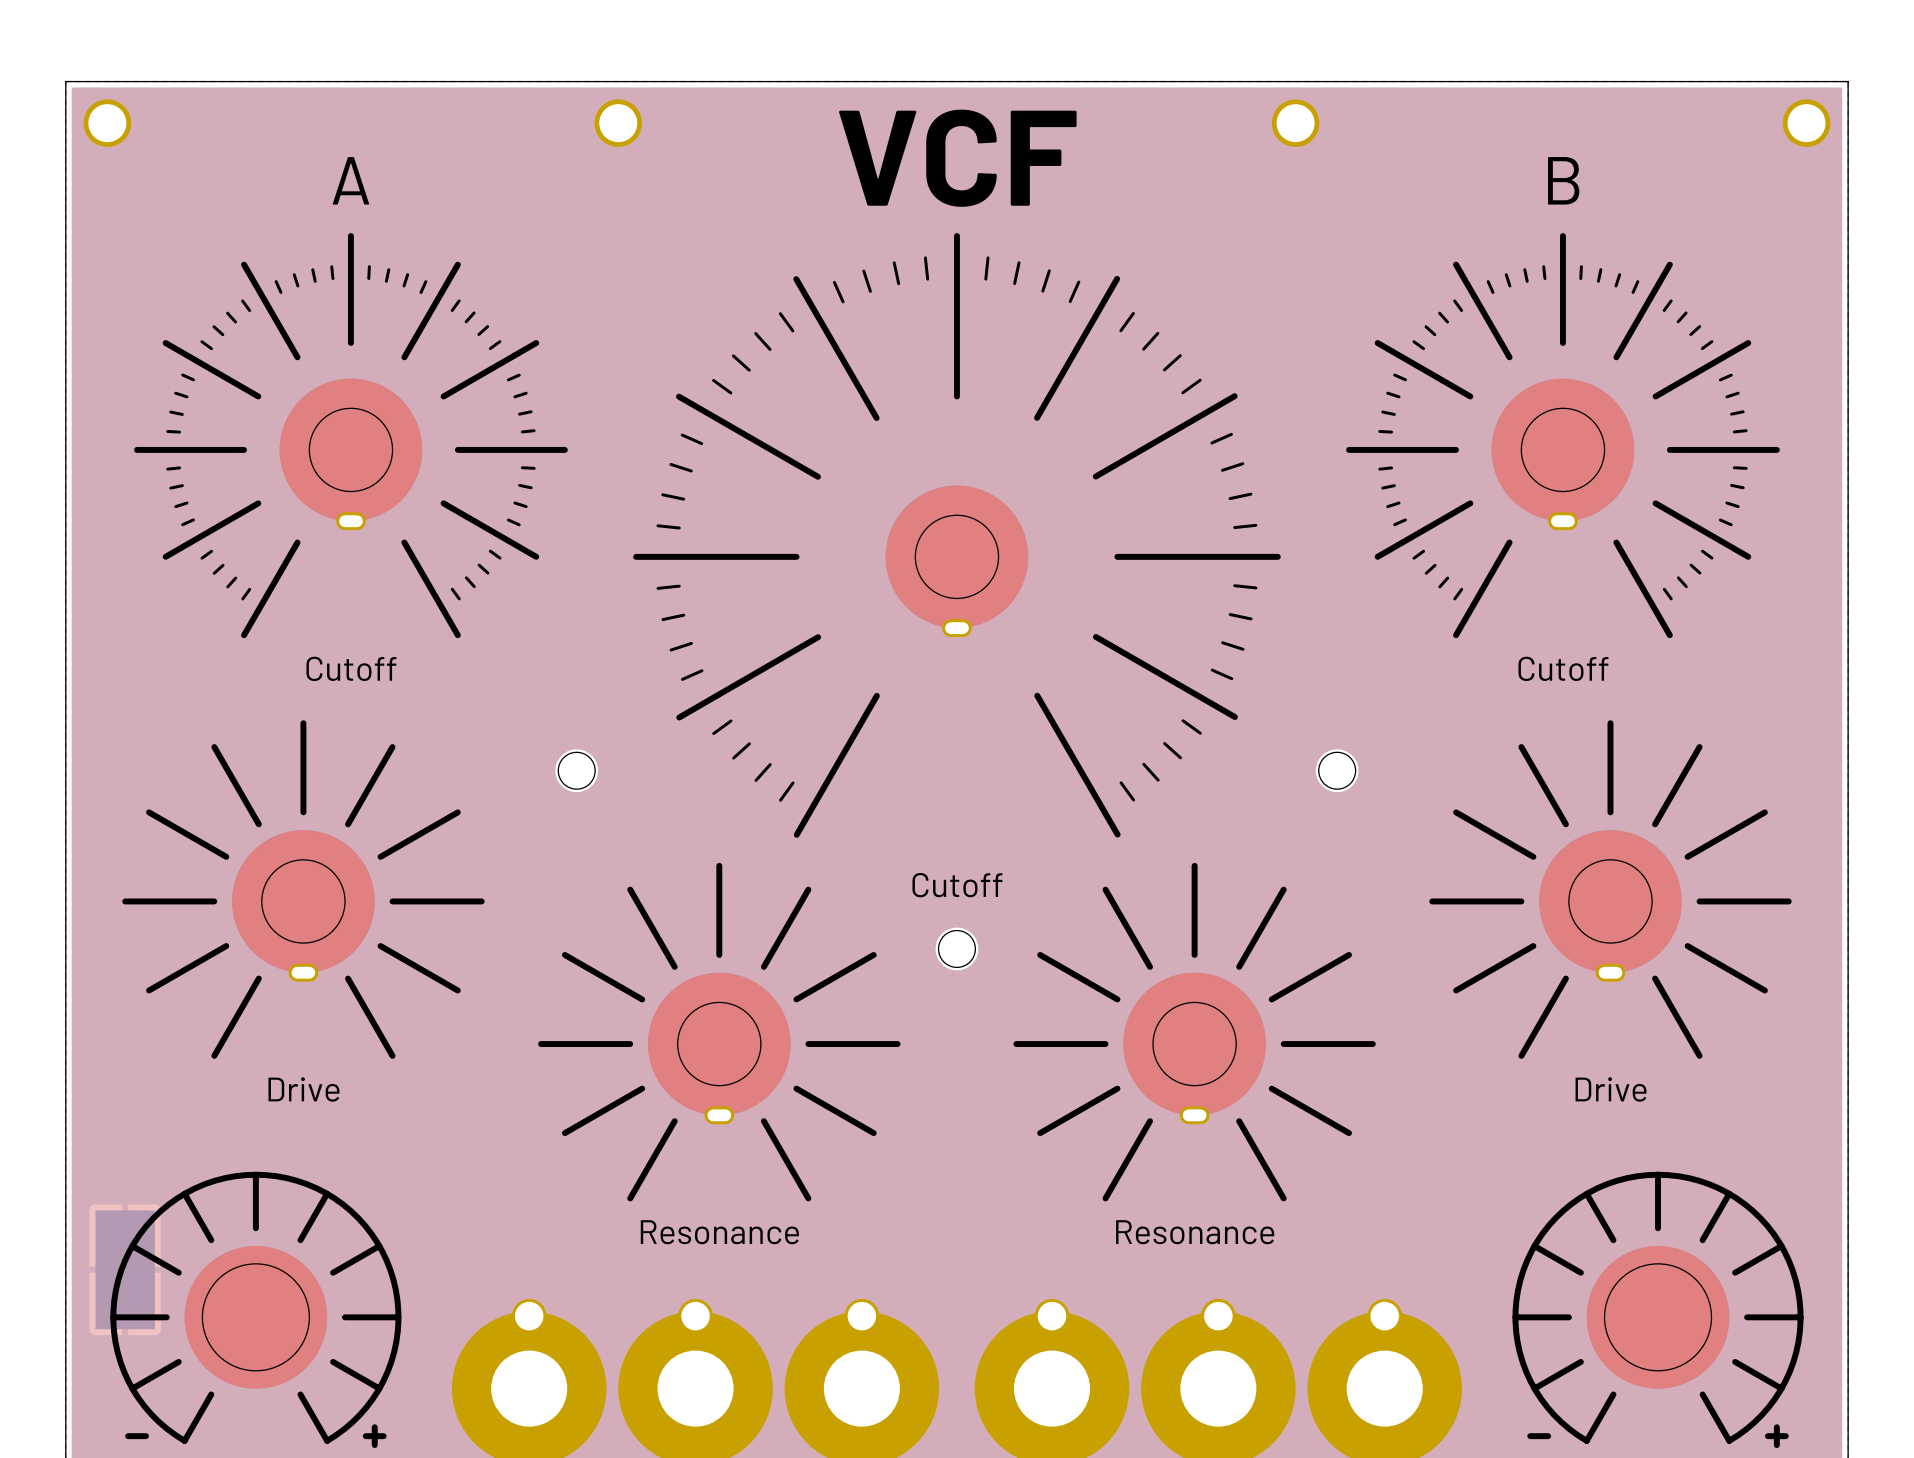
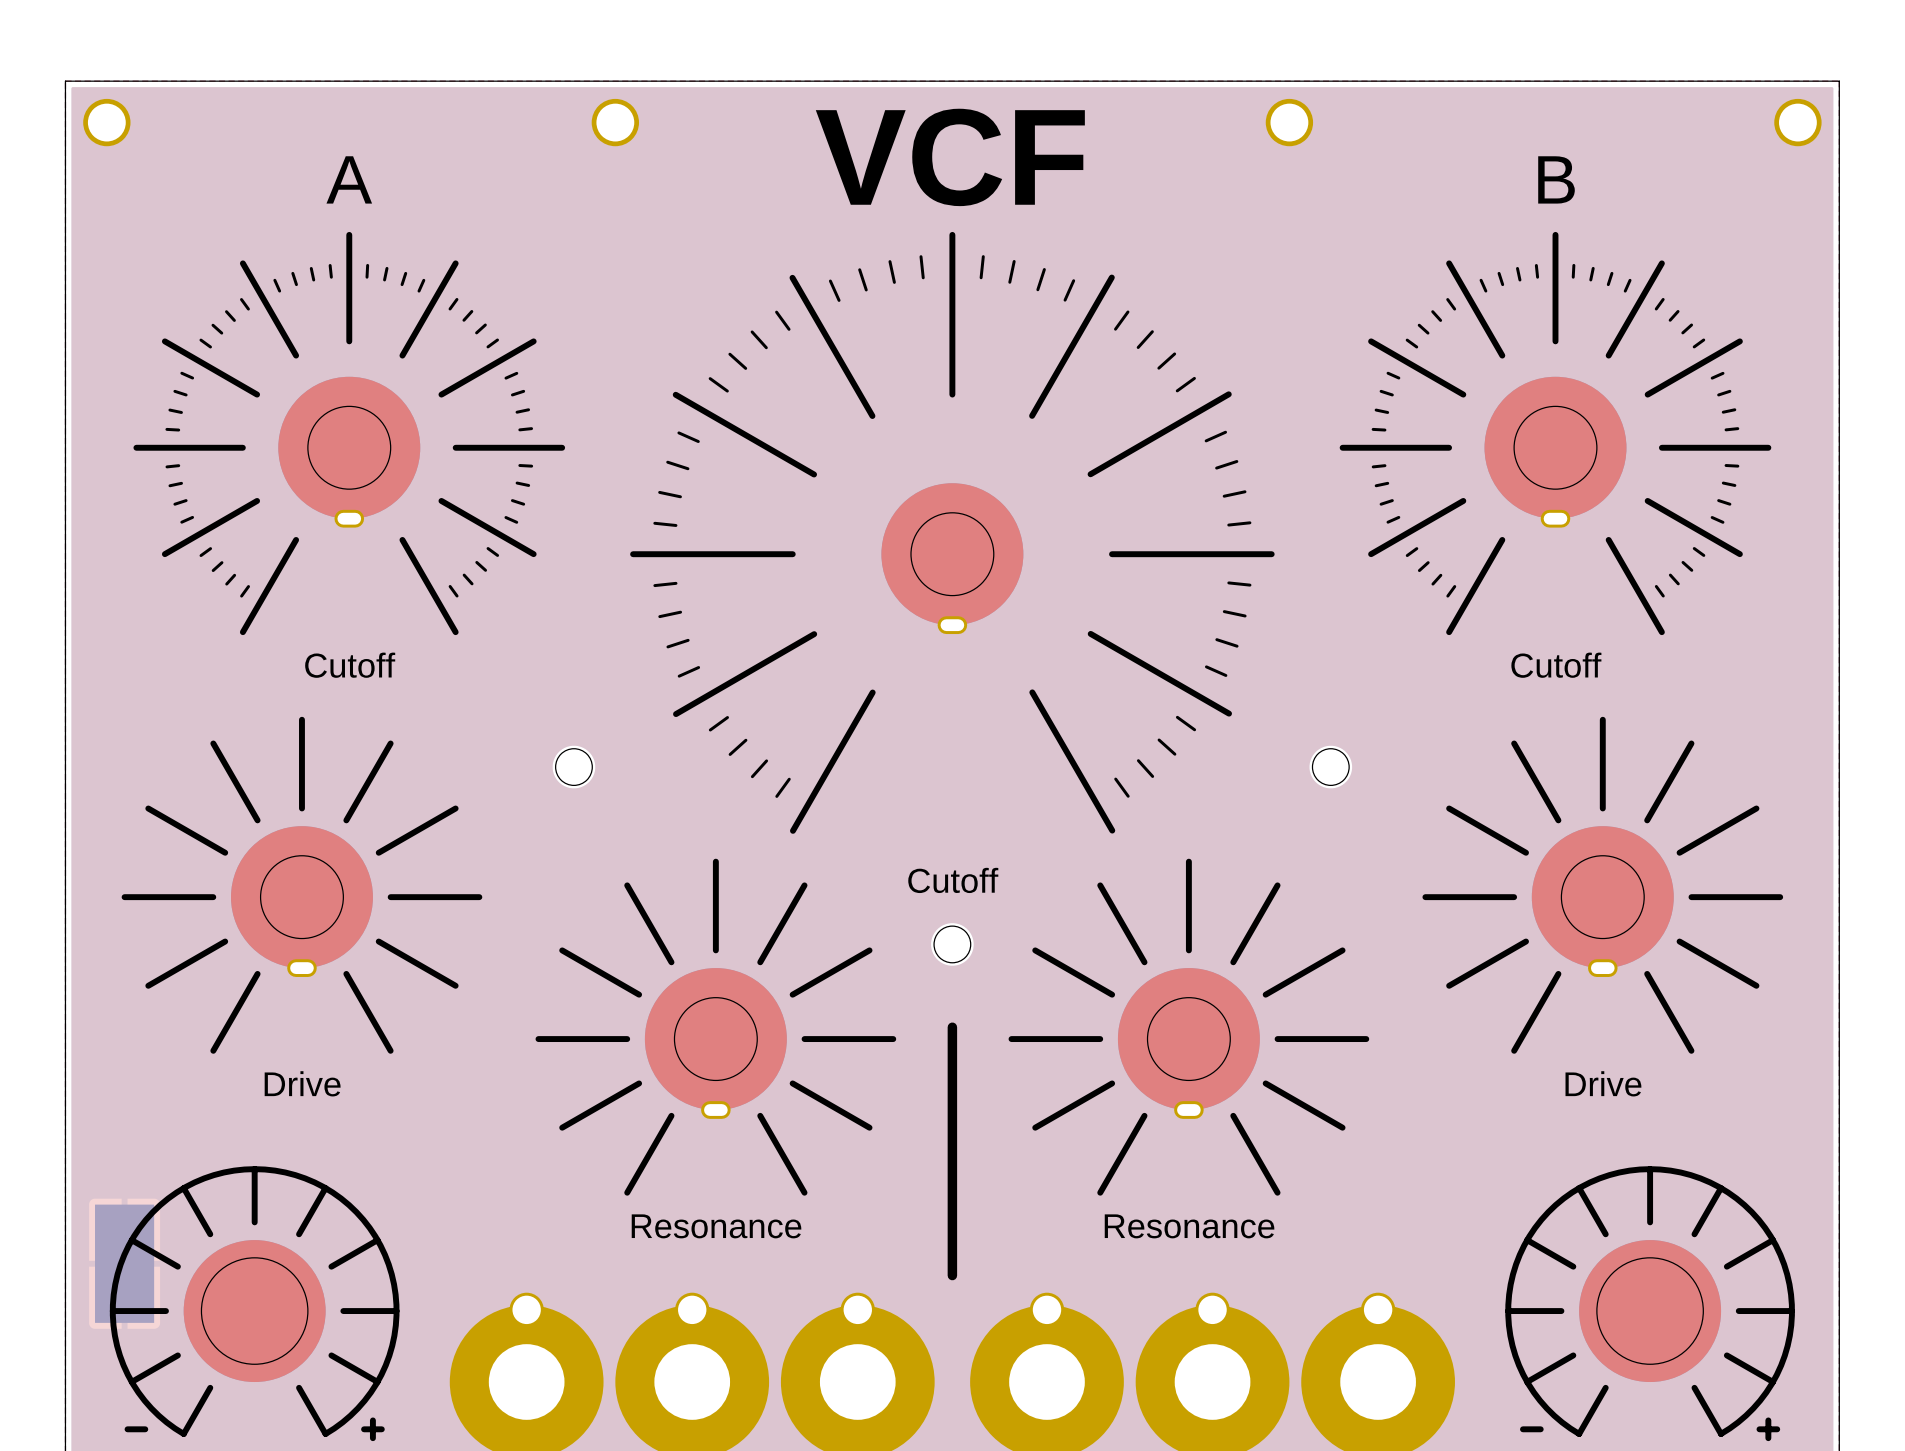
line: none -> (952, 1027) (952, 1275)

